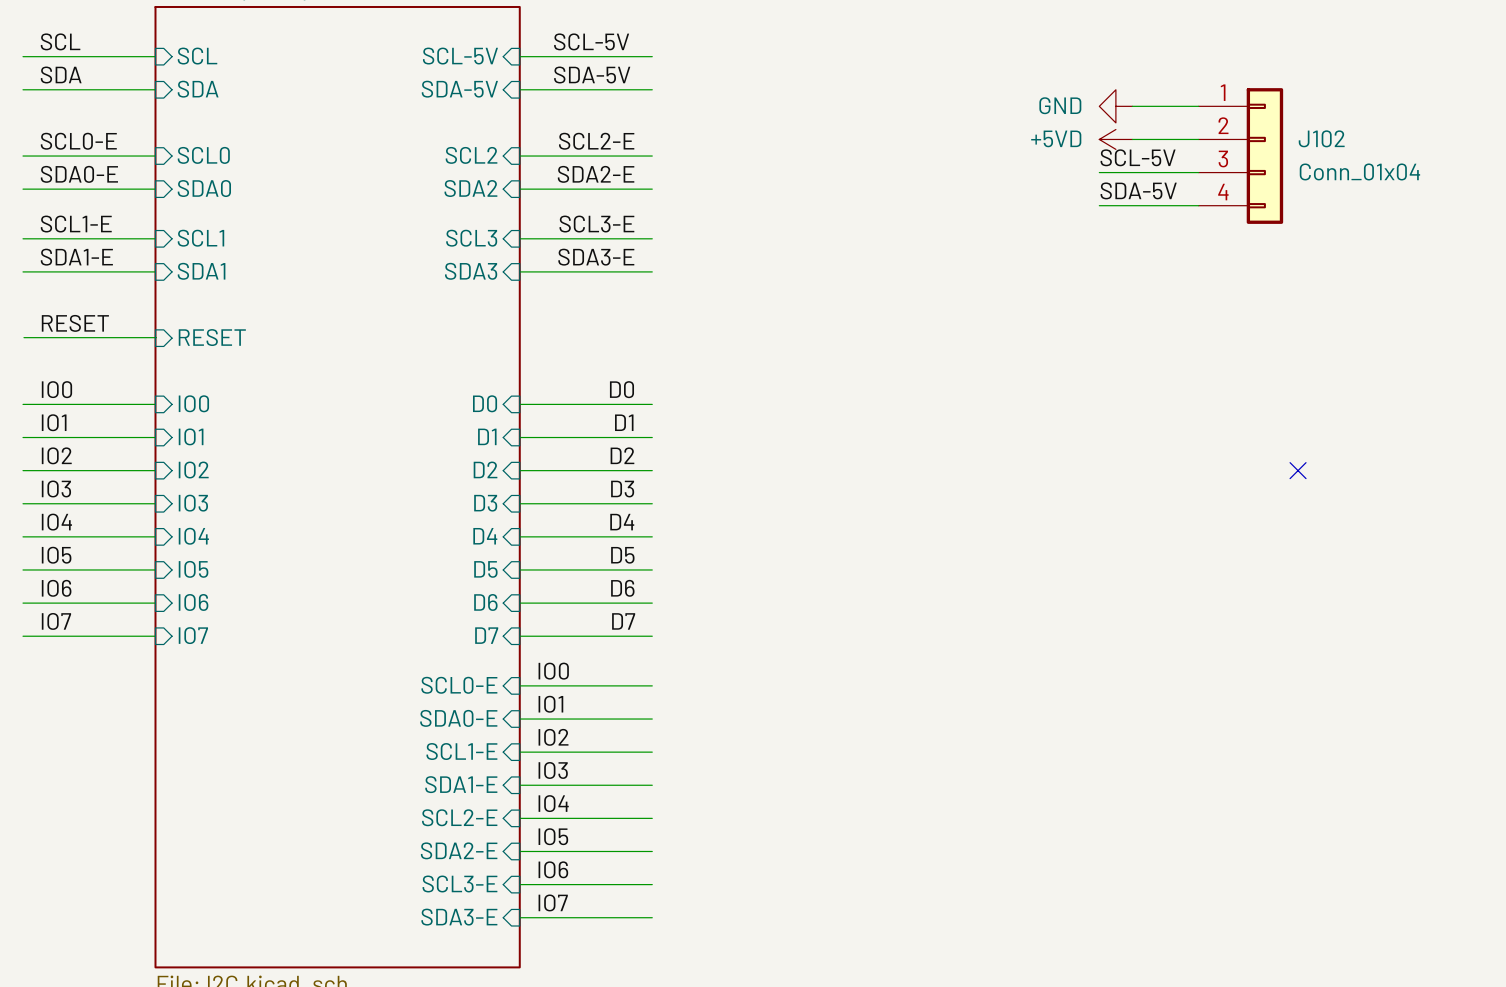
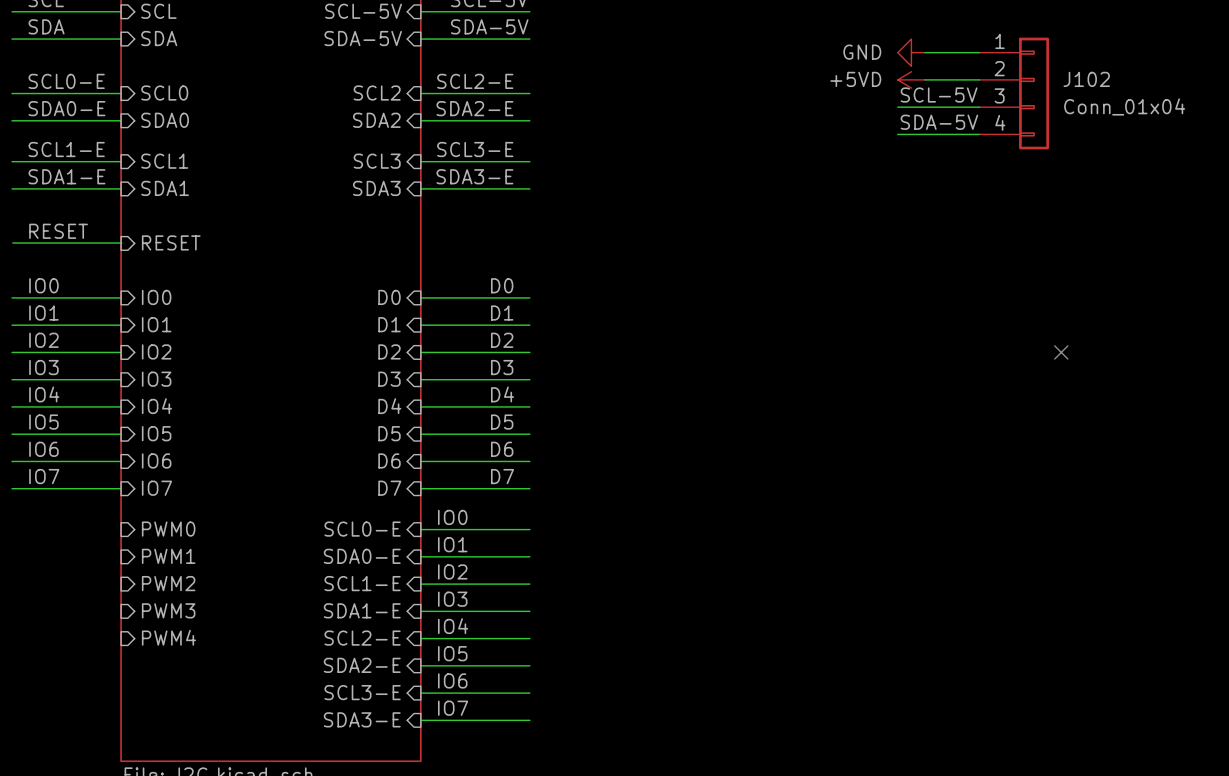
sheet pin: none -> PWM0 (168, 529)
sheet pin: none -> PWM1 (168, 556)
sheet pin: none -> PWM2 (168, 583)
sheet pin: none -> PWM3 (168, 610)
sheet pin: none -> PWM4 (168, 637)

